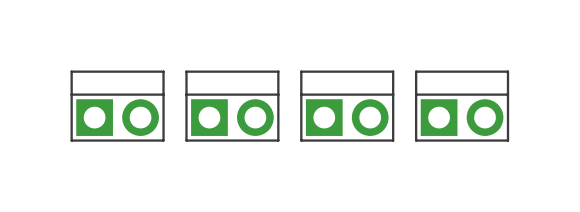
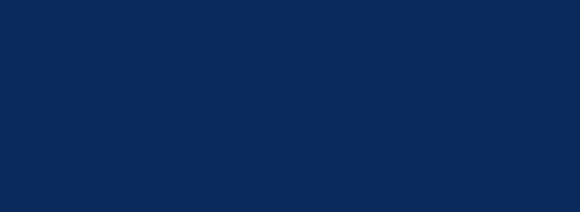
part: (117, 106) -> none
part: (232, 106) -> none
part: (347, 106) -> none
part: (462, 106) -> none

